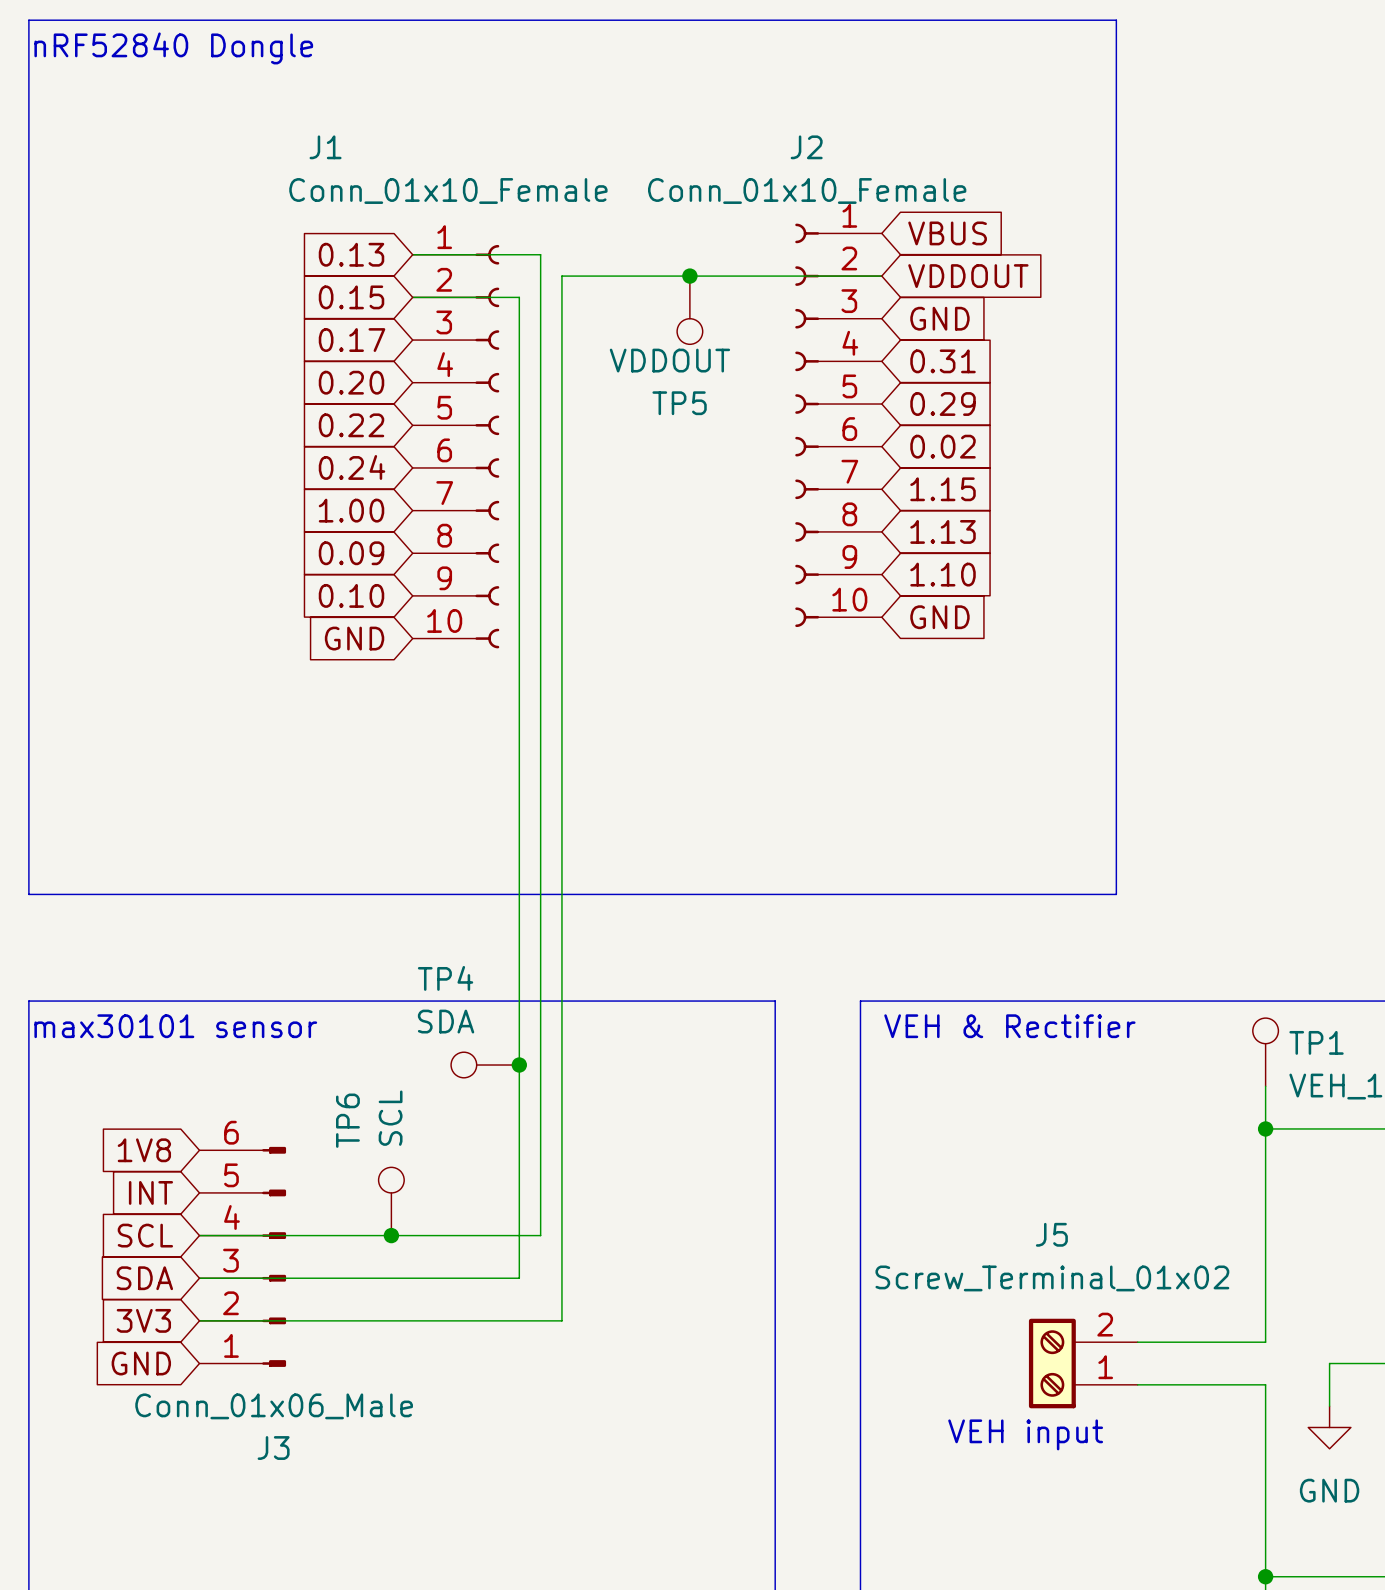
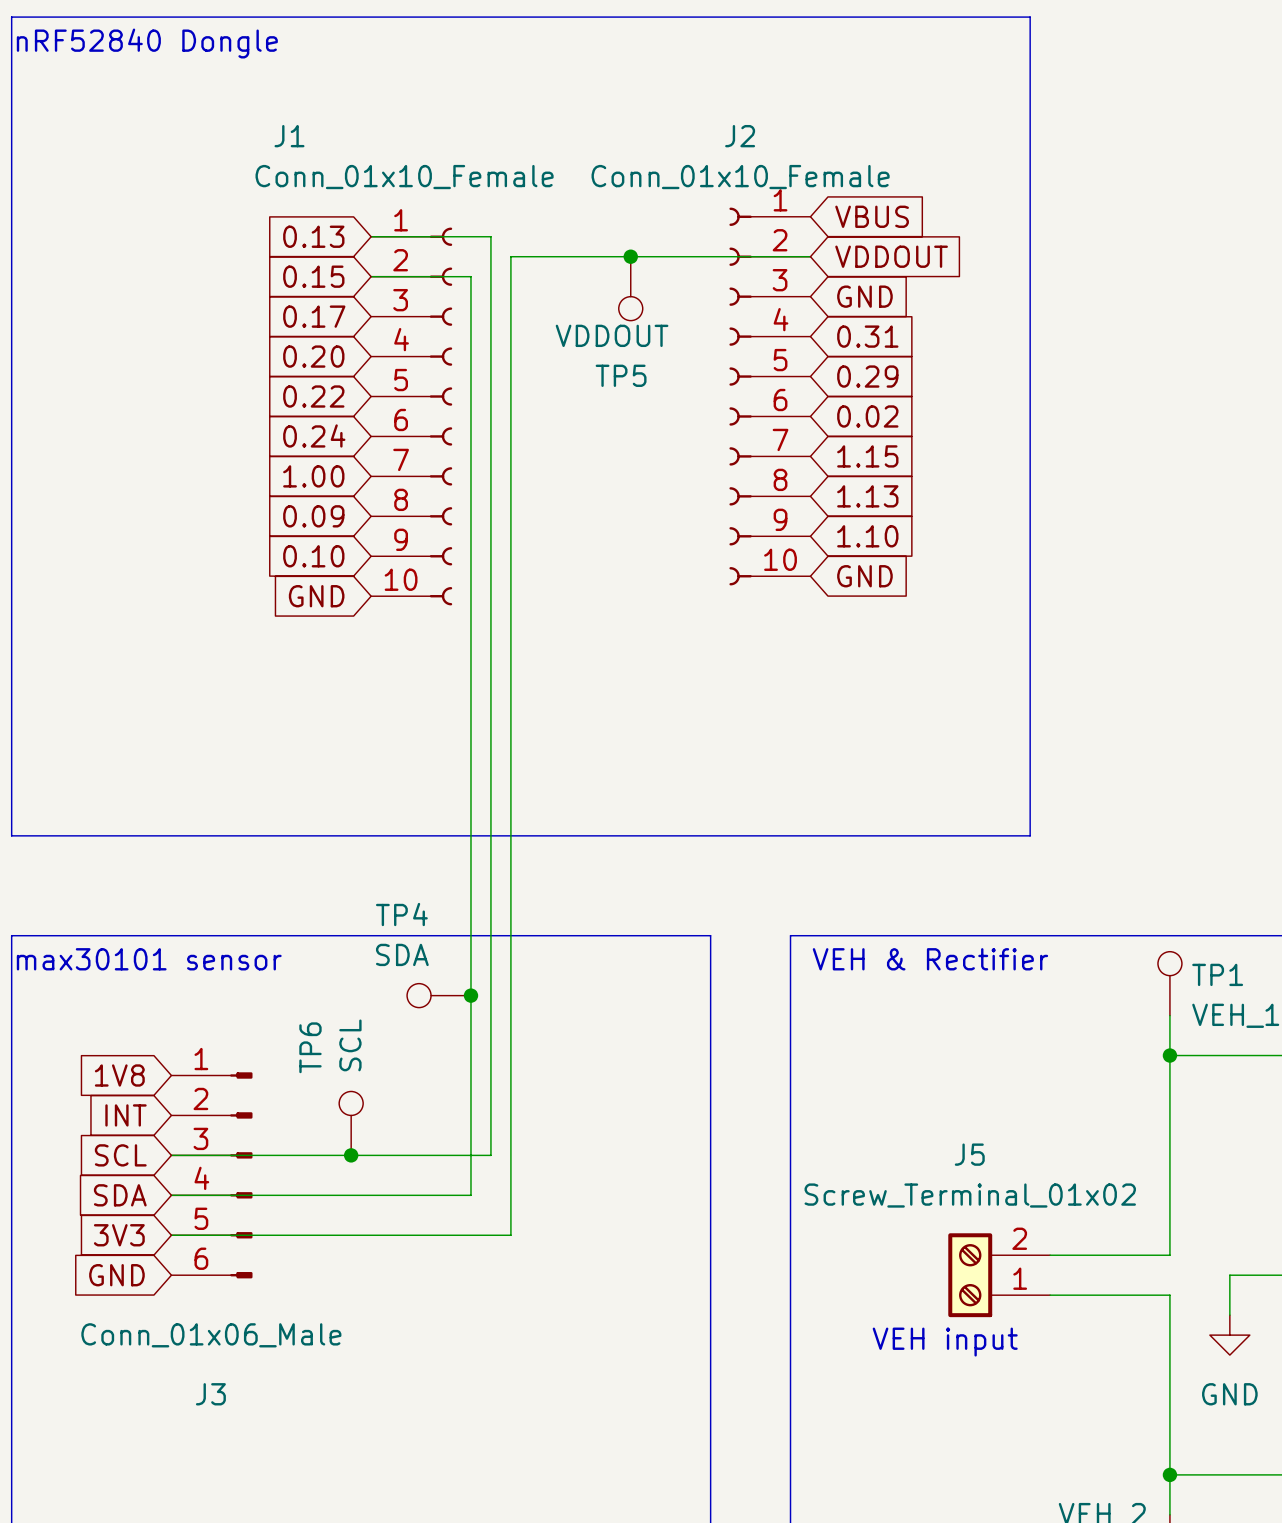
J3 flip: as is (274, 1256) -> up-down (241, 1175)
J3 value position: Conn_01x06_Male (274, 1406) -> Conn_01x06_Male (211, 1335)
J3 name position: J3 (273, 1448) -> J3 (210, 1394)

